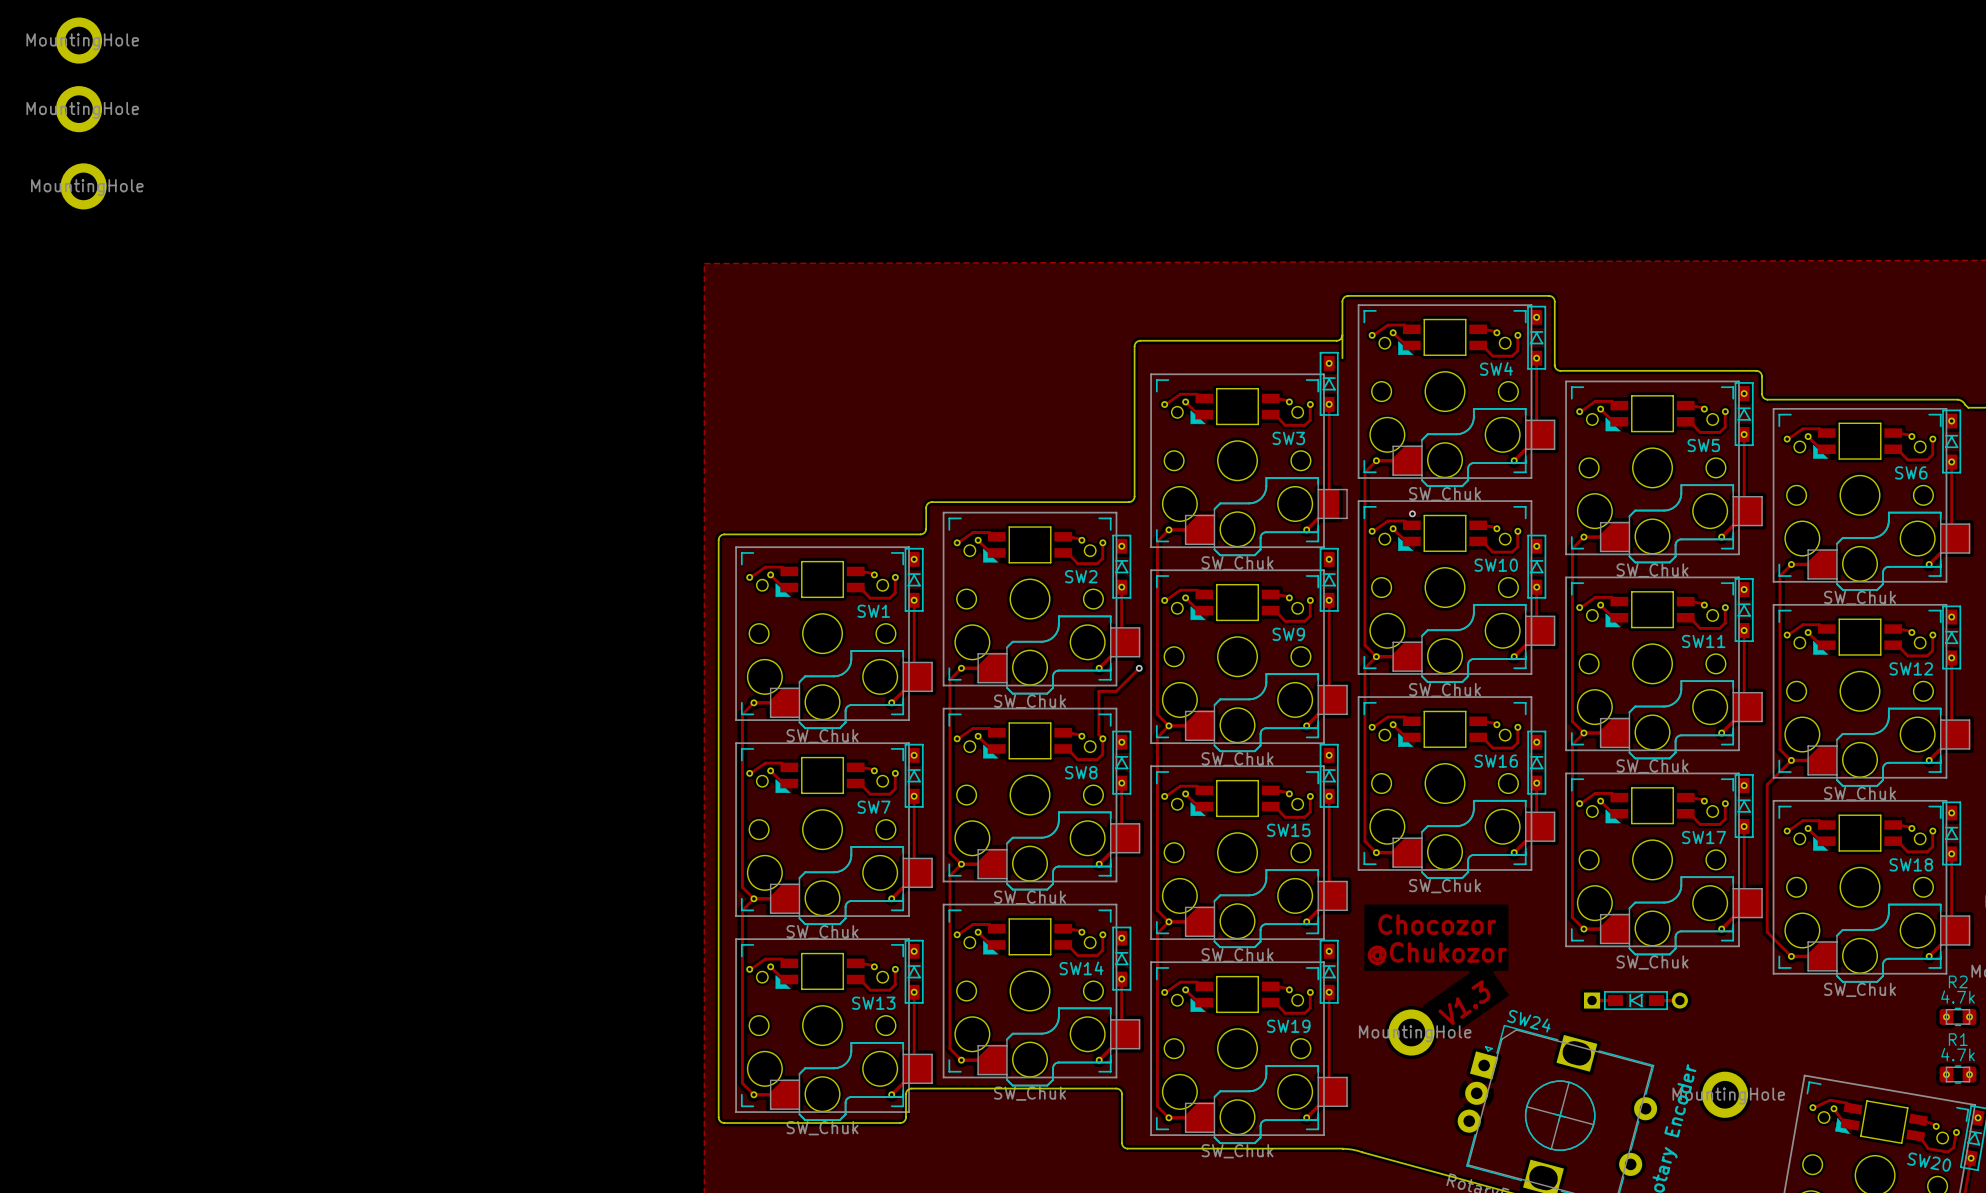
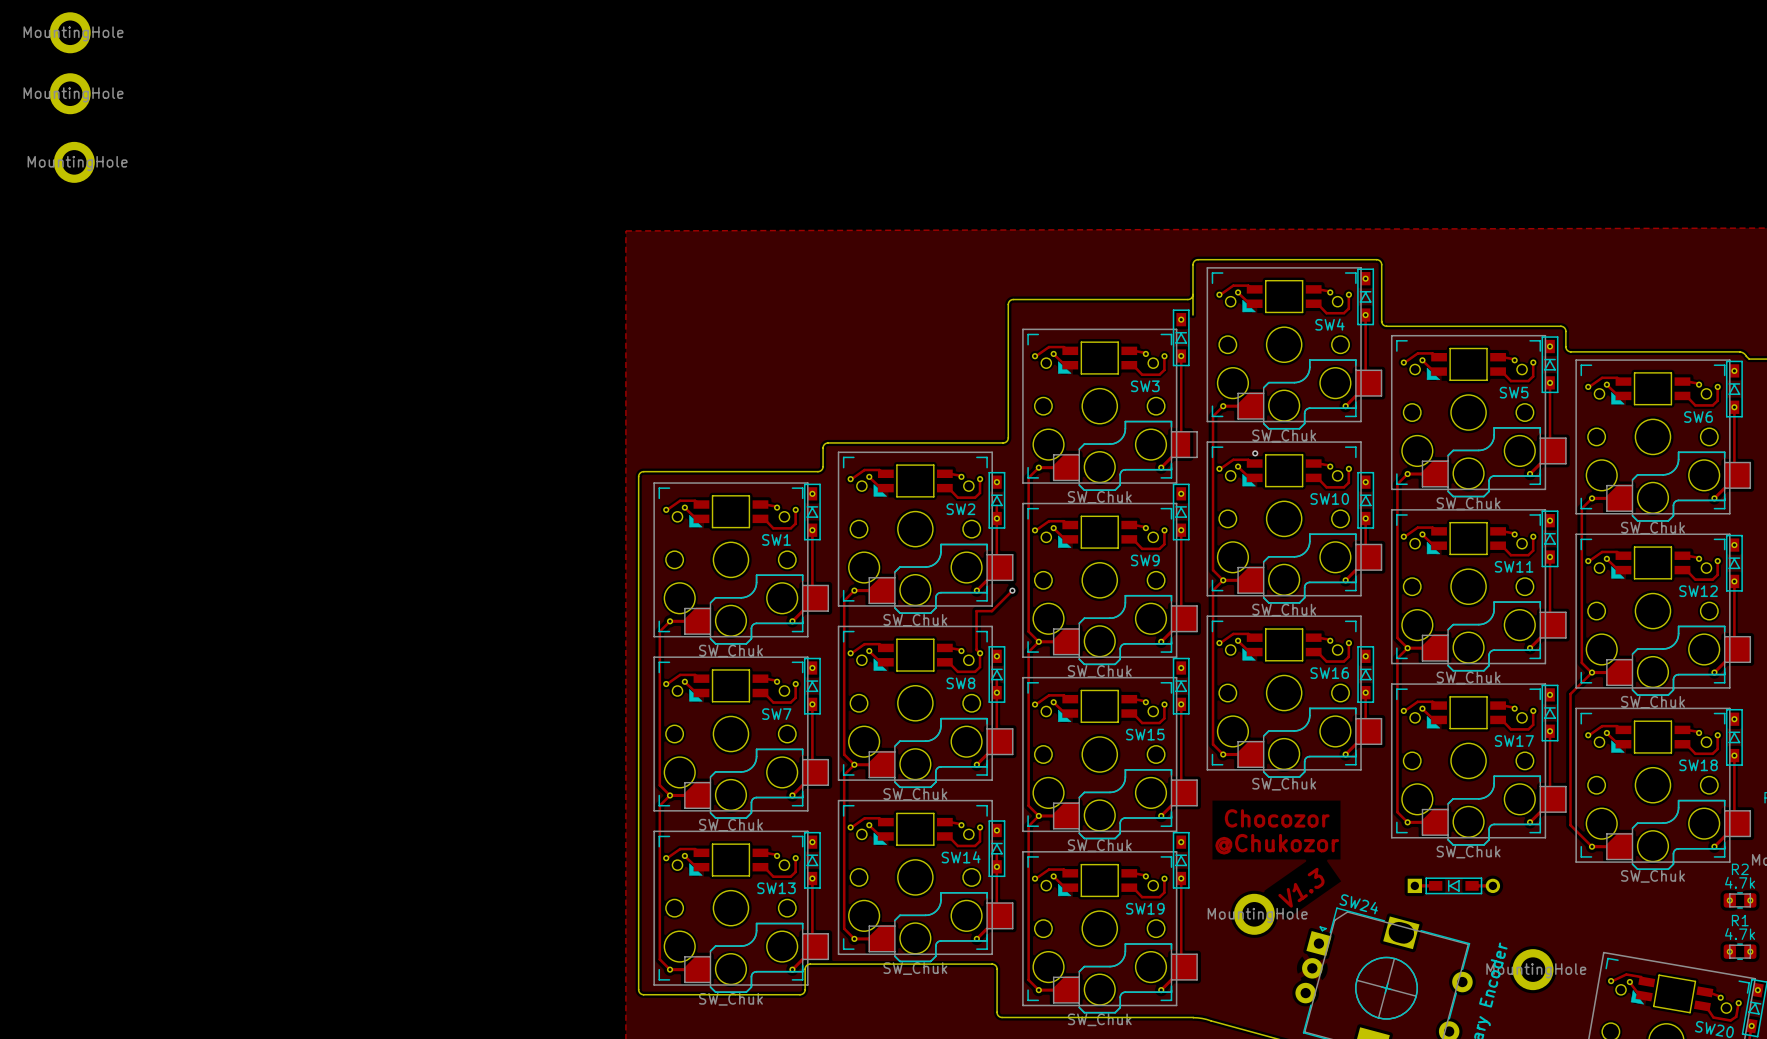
SW2 footprint: [942, 511, 1141, 695] -> [837, 451, 1014, 614]
SW8 footprint: [942, 707, 1141, 891] -> [837, 625, 1014, 789]
SW14 footprint: [942, 903, 1141, 1087] -> [837, 799, 1014, 963]

